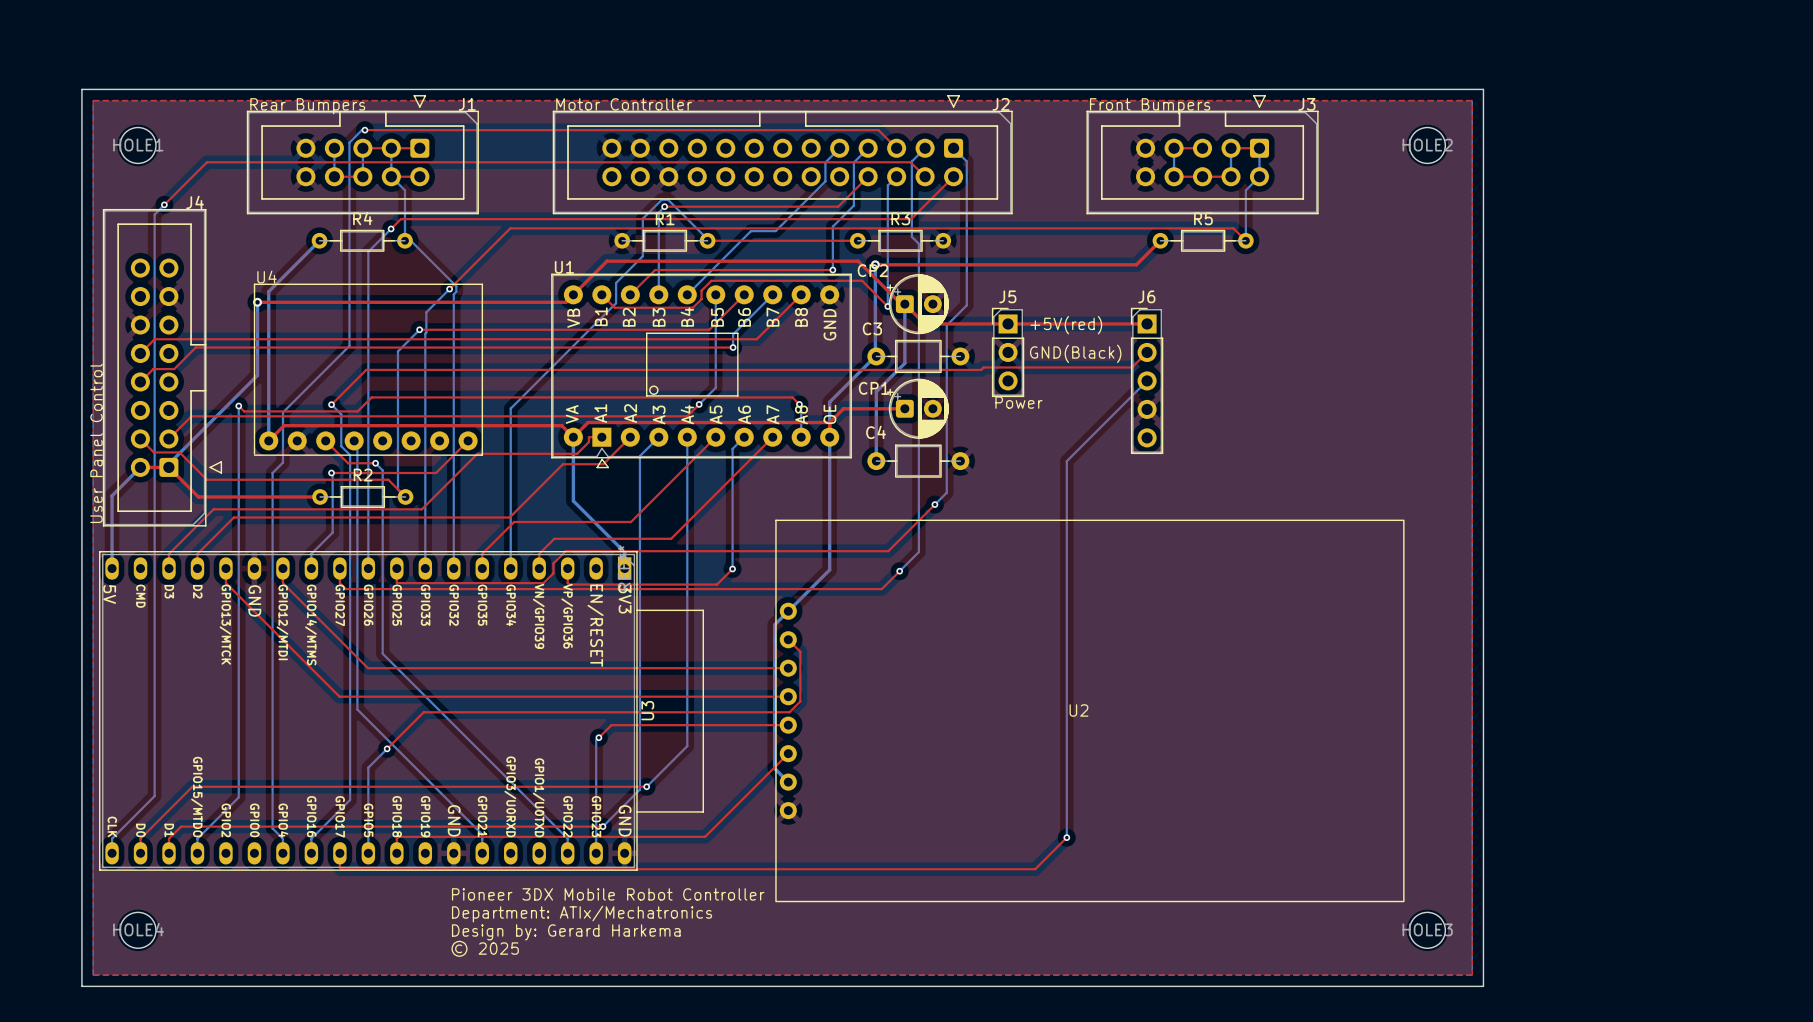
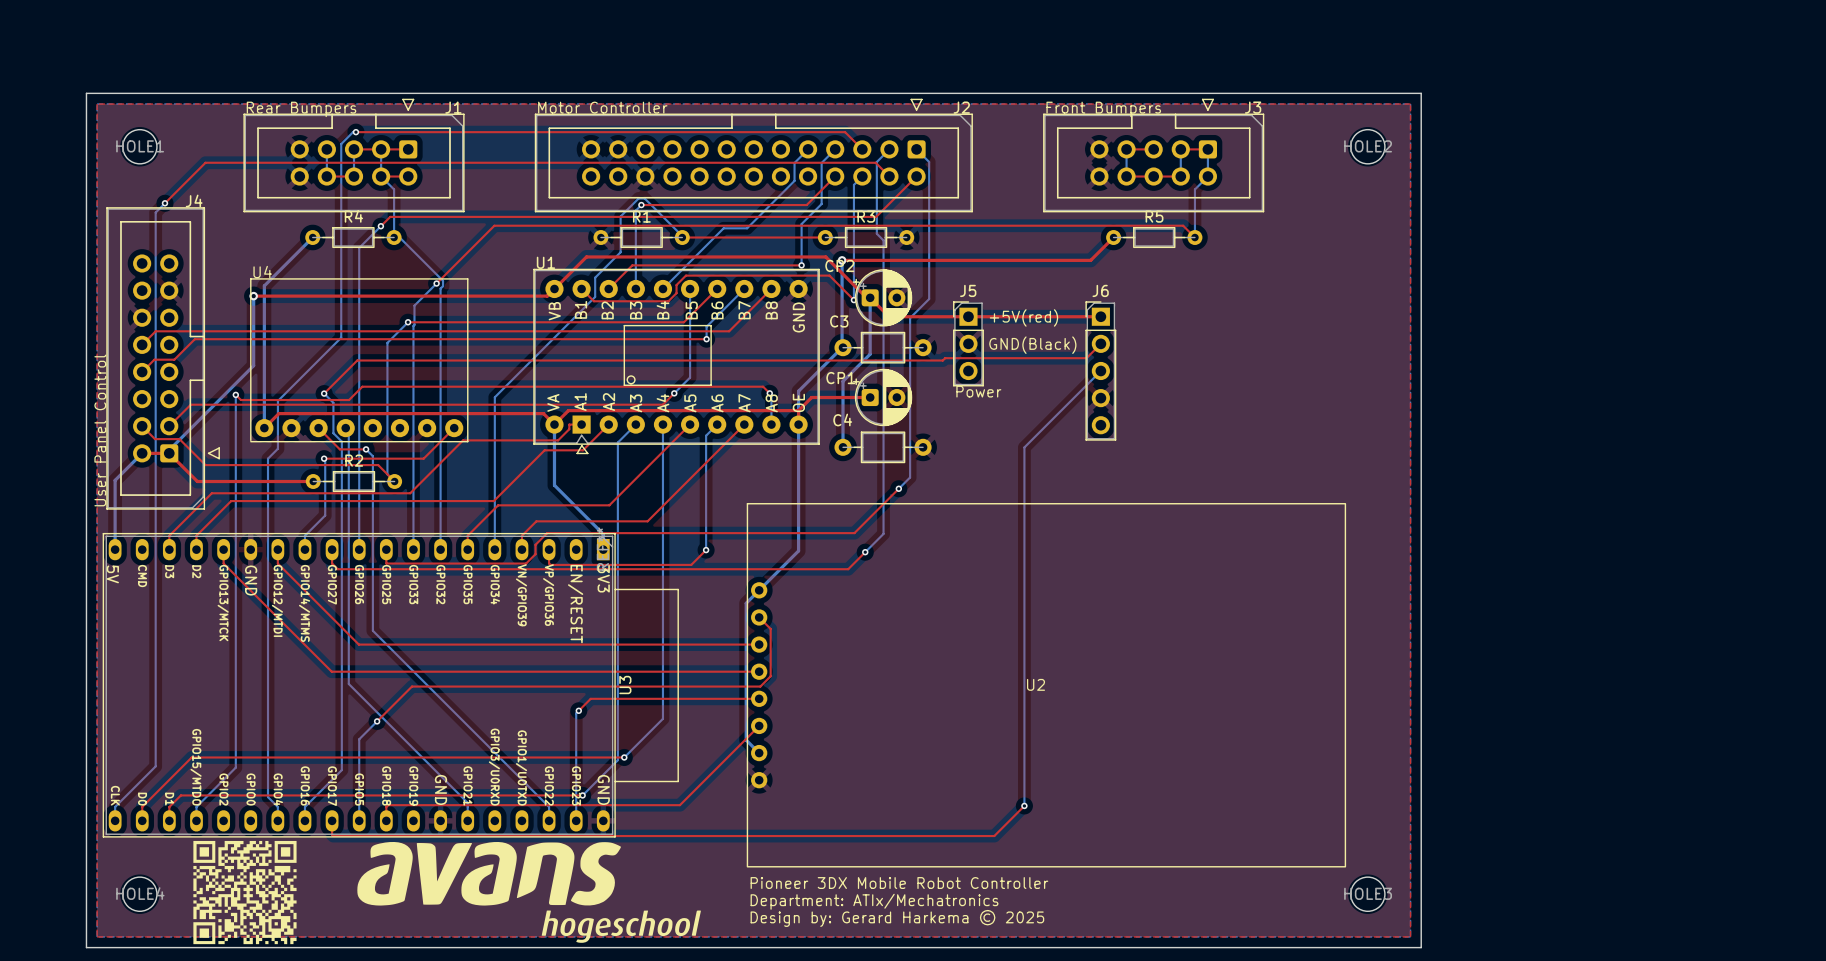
drawing: none -> [193, 840, 297, 945]
drawing: none -> [357, 841, 701, 943]
text: Pioneer 3DX Mobile Robot Controller (608, 894) -> none
text: Department: ATIx/Mechatronics (582, 914) -> none
text: none -> Pioneer 3DX Mobile Robot Controller (899, 883)
text: Design by: Gerard Harkema (566, 932) -> none
text: none -> Department: ATIx/Mechatronics (874, 901)
text: © 2025 (485, 948) -> none
text: none -> Design by: Gerard Harkema © 2025 (897, 918)

